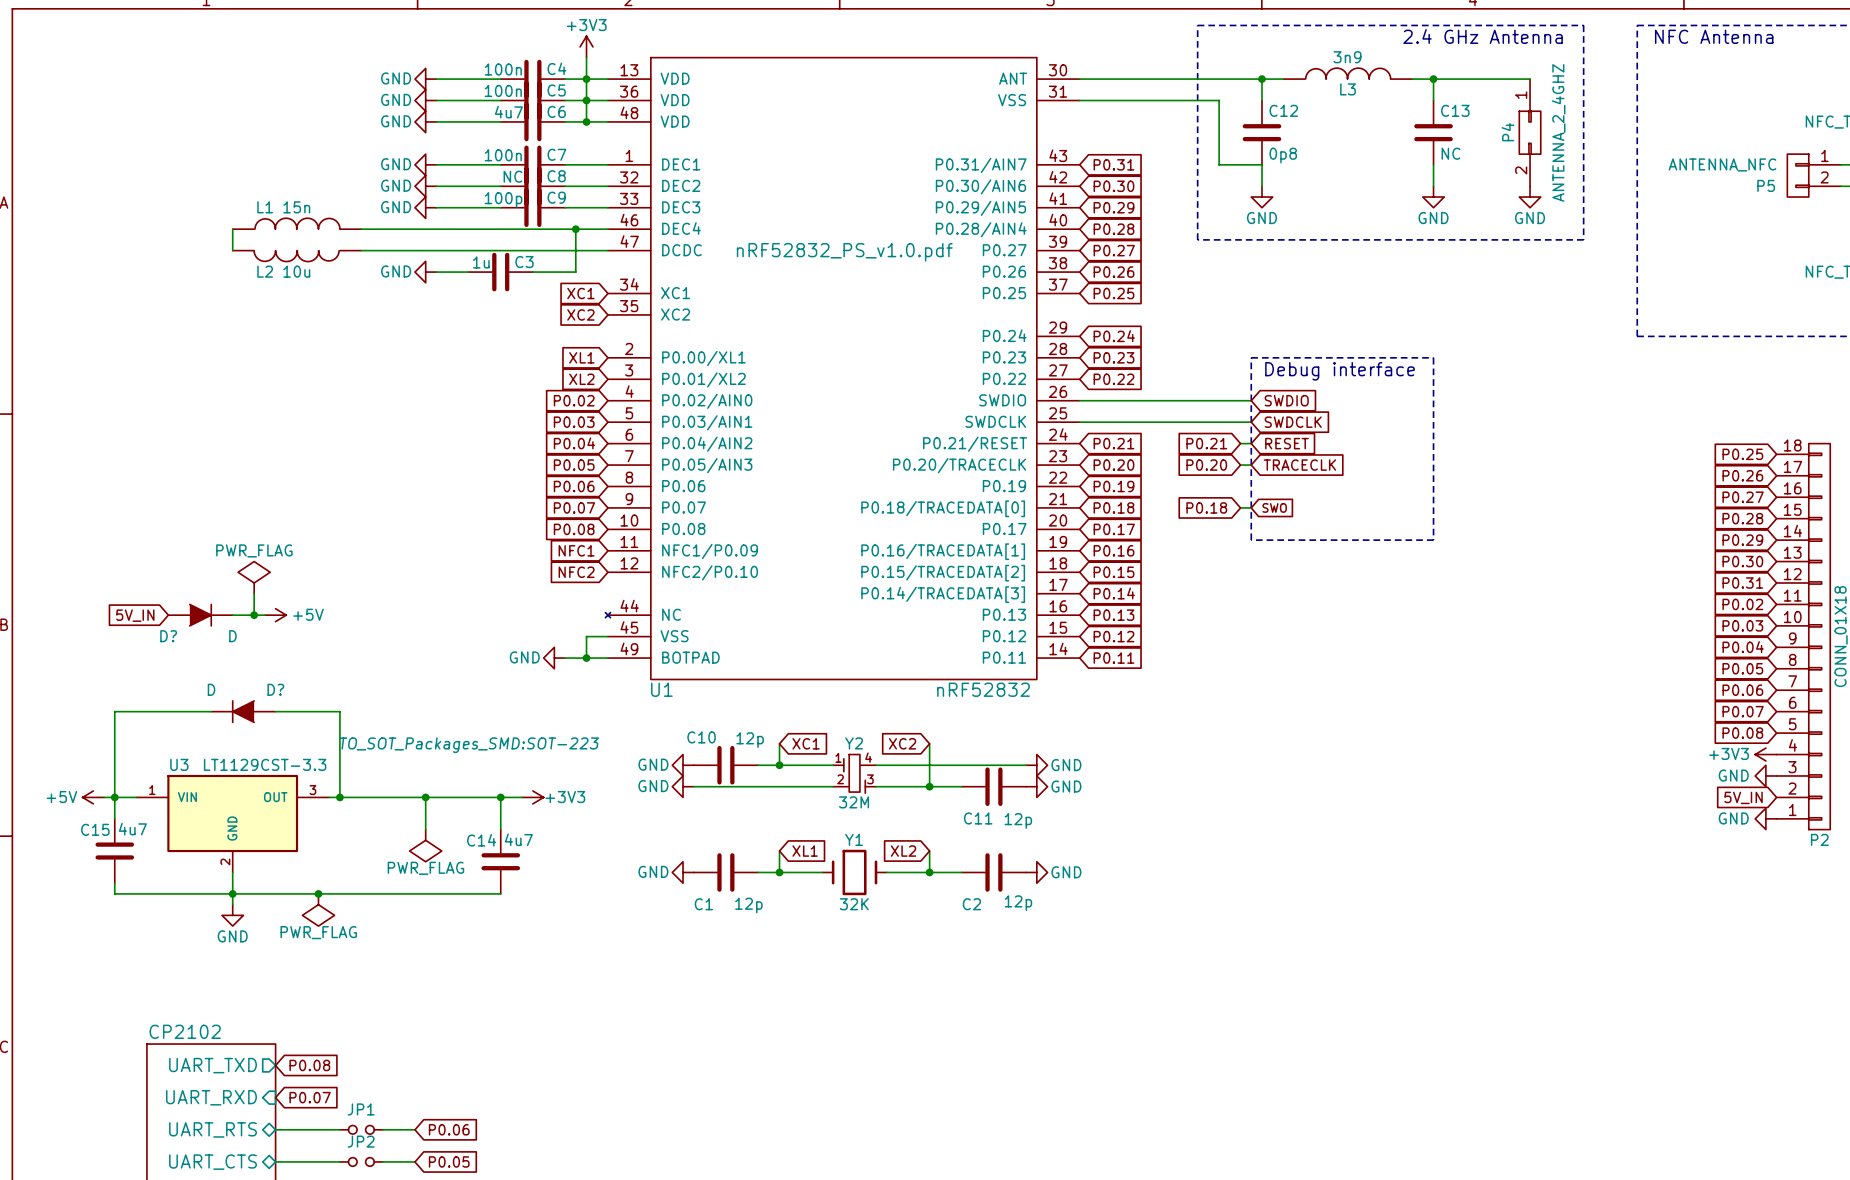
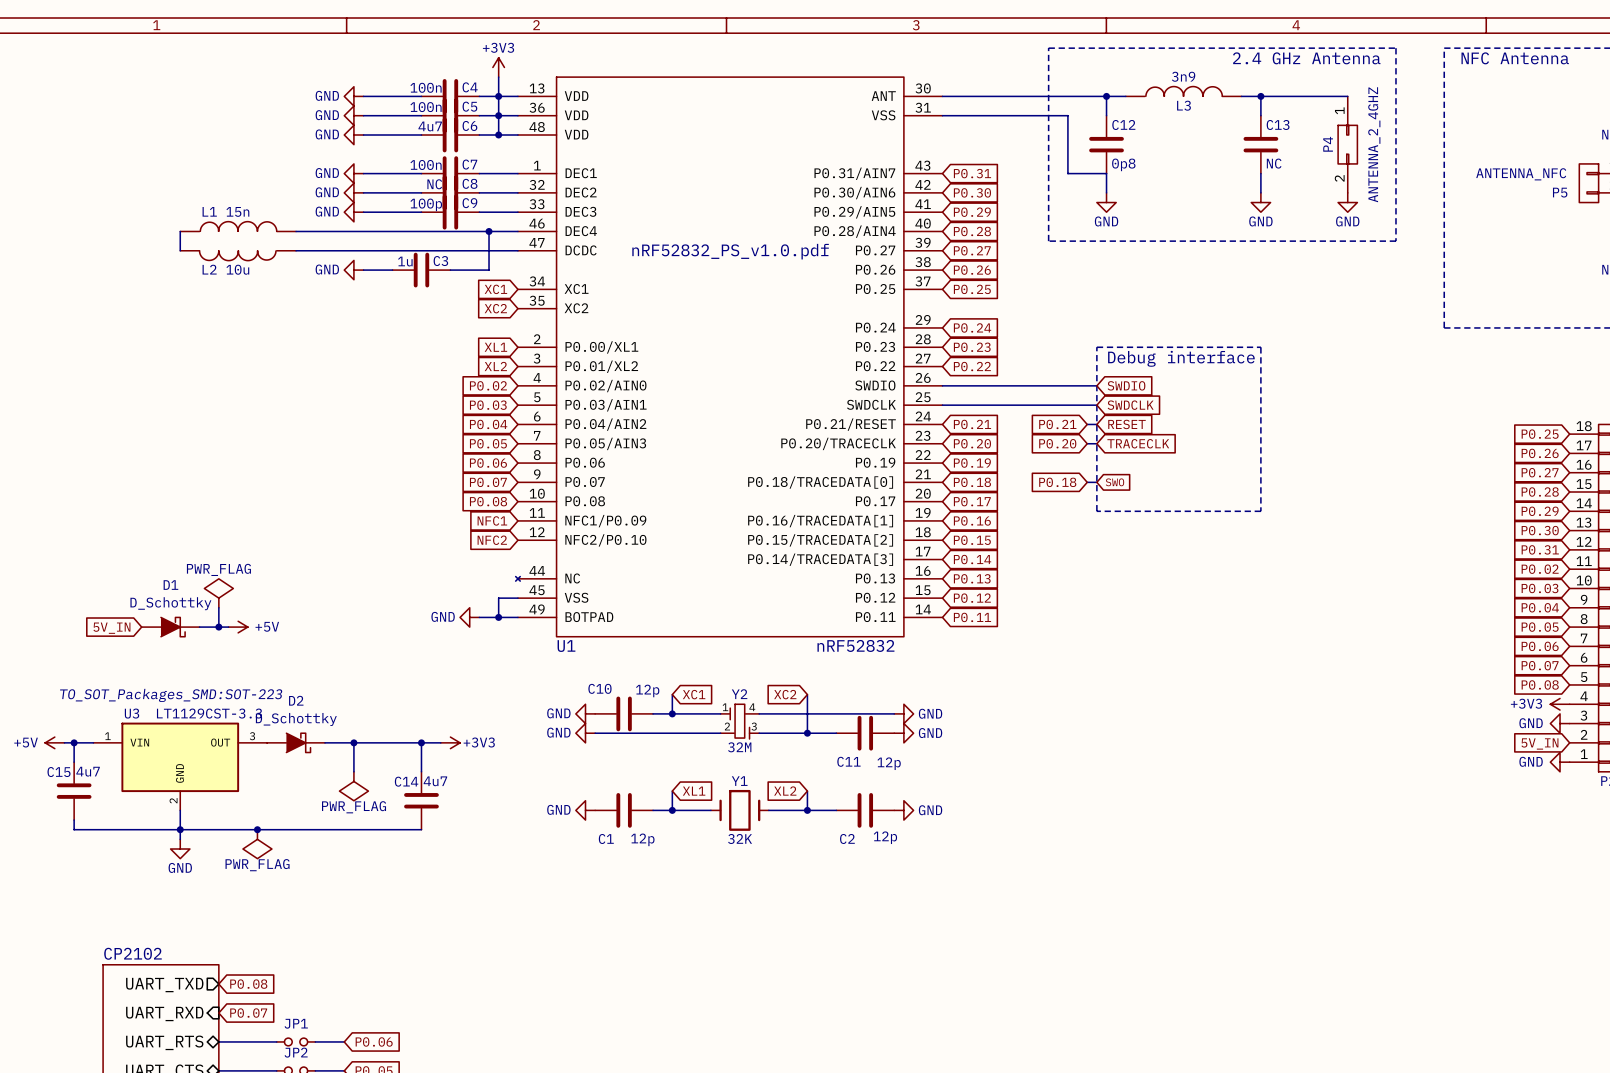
power symbol position: PWR_FLAG (254, 577) -> PWR_FLAG (218, 593)
wire: (254, 593) (254, 615) -> (218, 607) (218, 627)
global label position: 5V_IN (135, 615) -> 5V_IN (111, 628)
D?: D (200, 615) -> none
wire: (232, 615) (264, 615) -> (199, 627) (228, 627)
junction: (254, 615) -> none
power symbol position: +5V (275, 615) -> +5V (238, 627)
D1: none -> D_Schottky (170, 627)
junction: none -> (218, 627)
wire: (211, 711) (114, 711) (114, 797) -> none
D?: D (243, 711) -> none
wire: (275, 711) (339, 711) (339, 797) -> none
U3 text position: TO_SOT_Packages_SMD:SOT-223 (469, 745) -> TO_SOT_Packages_SMD:SOT-223 (171, 695)
junction: (339, 797) -> none
D2: none -> D_Schottky (296, 742)

